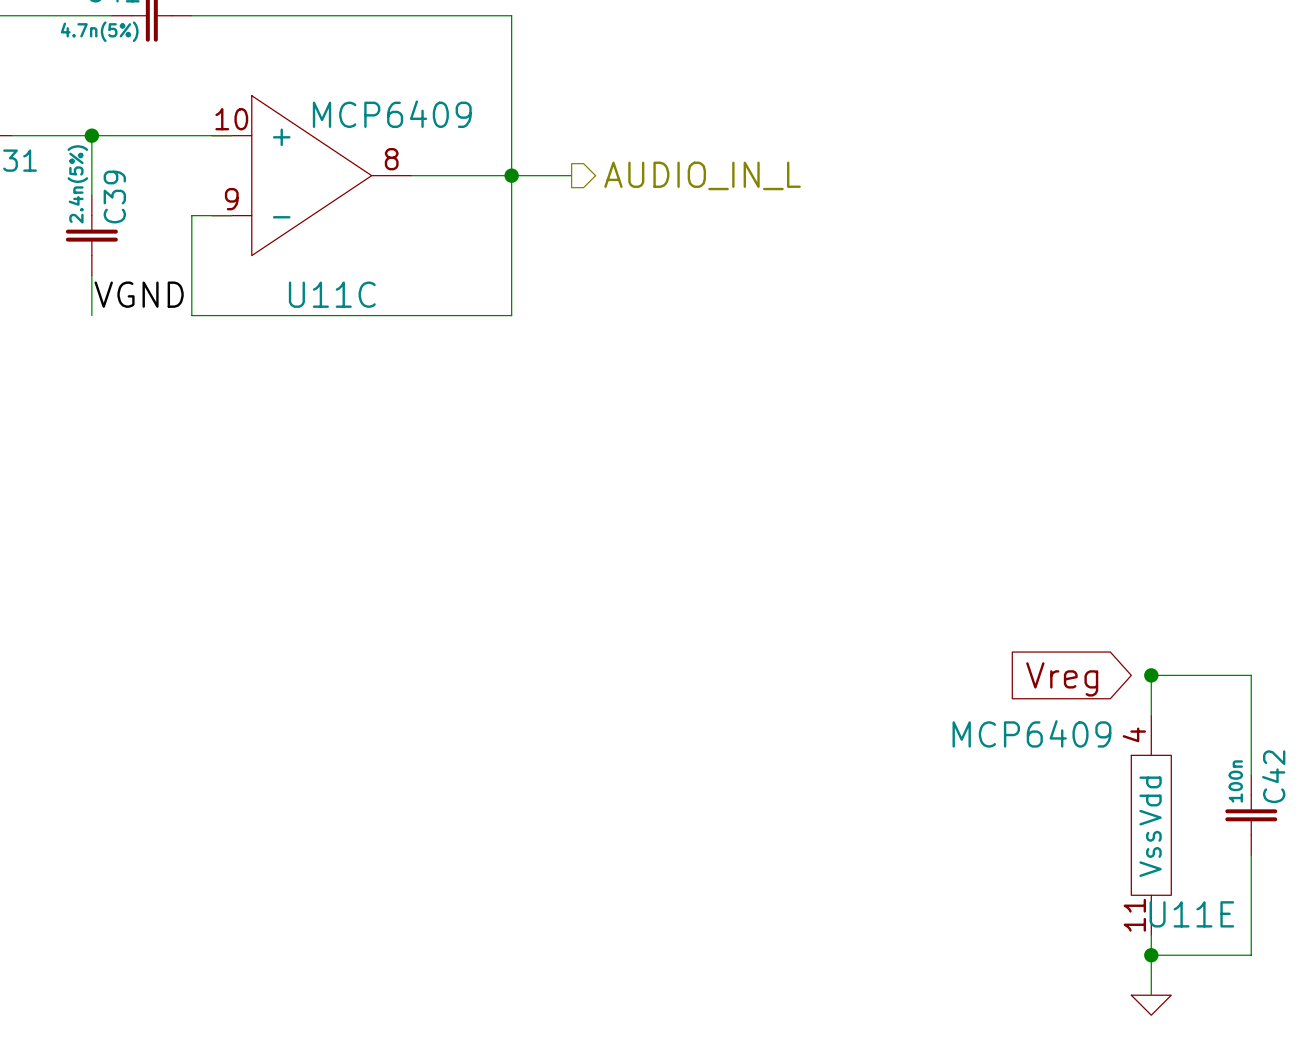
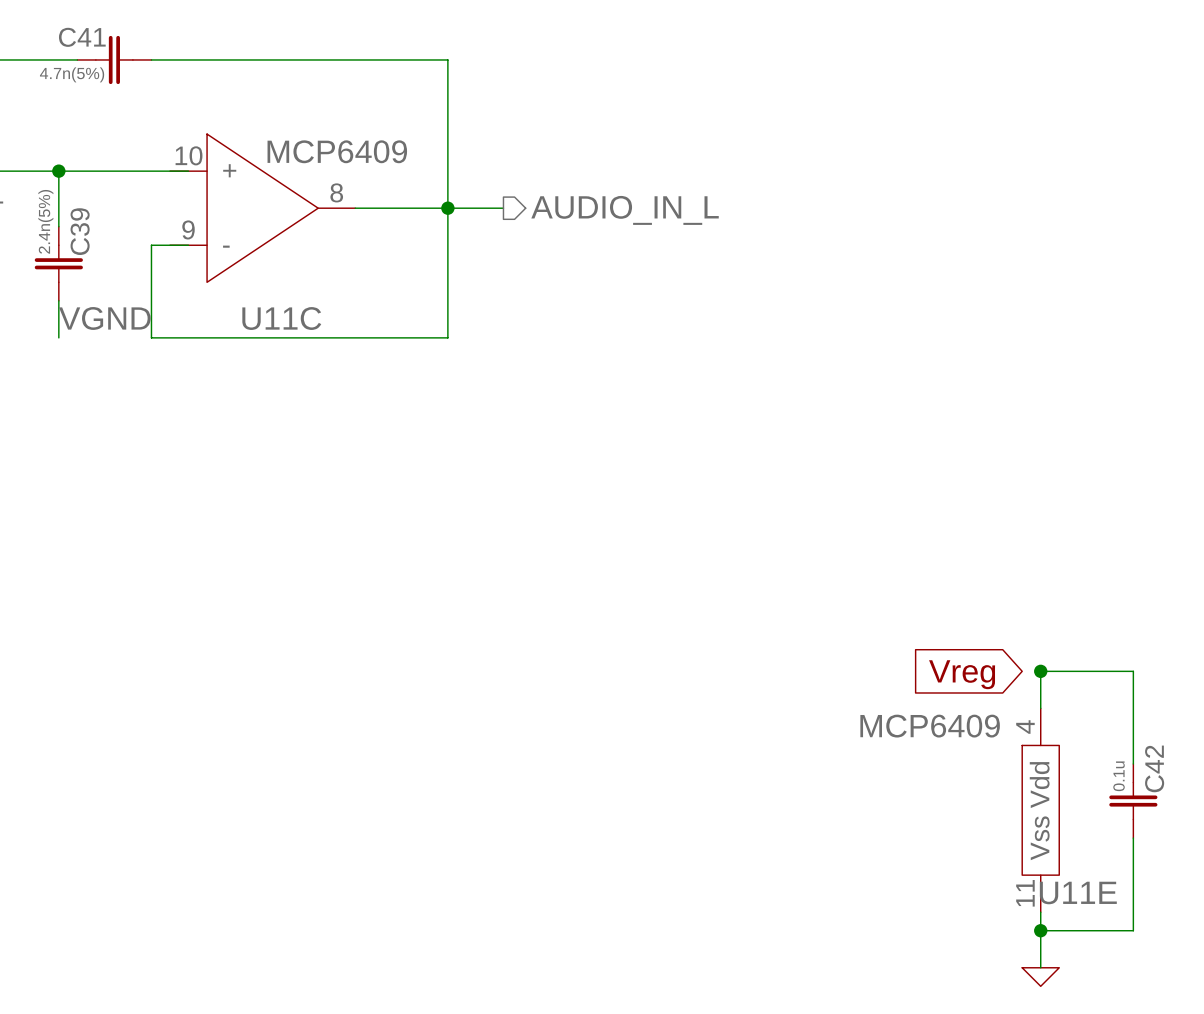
C42 value: 100n (1235, 781) -> 0.1u (1119, 776)

